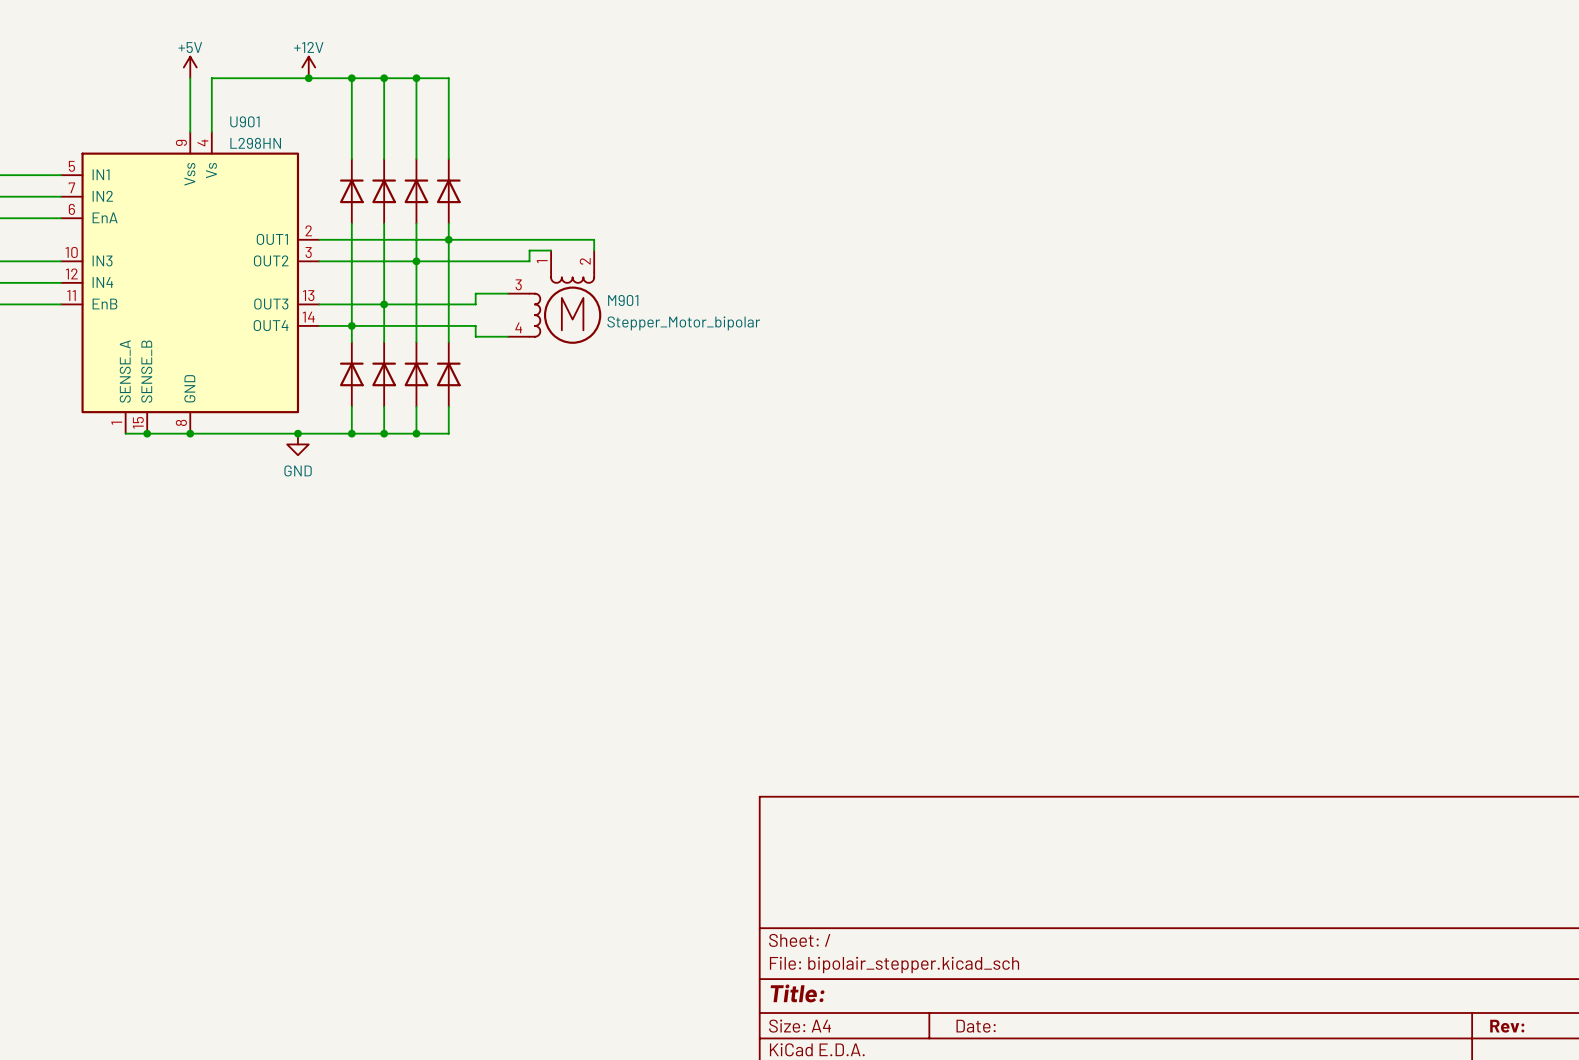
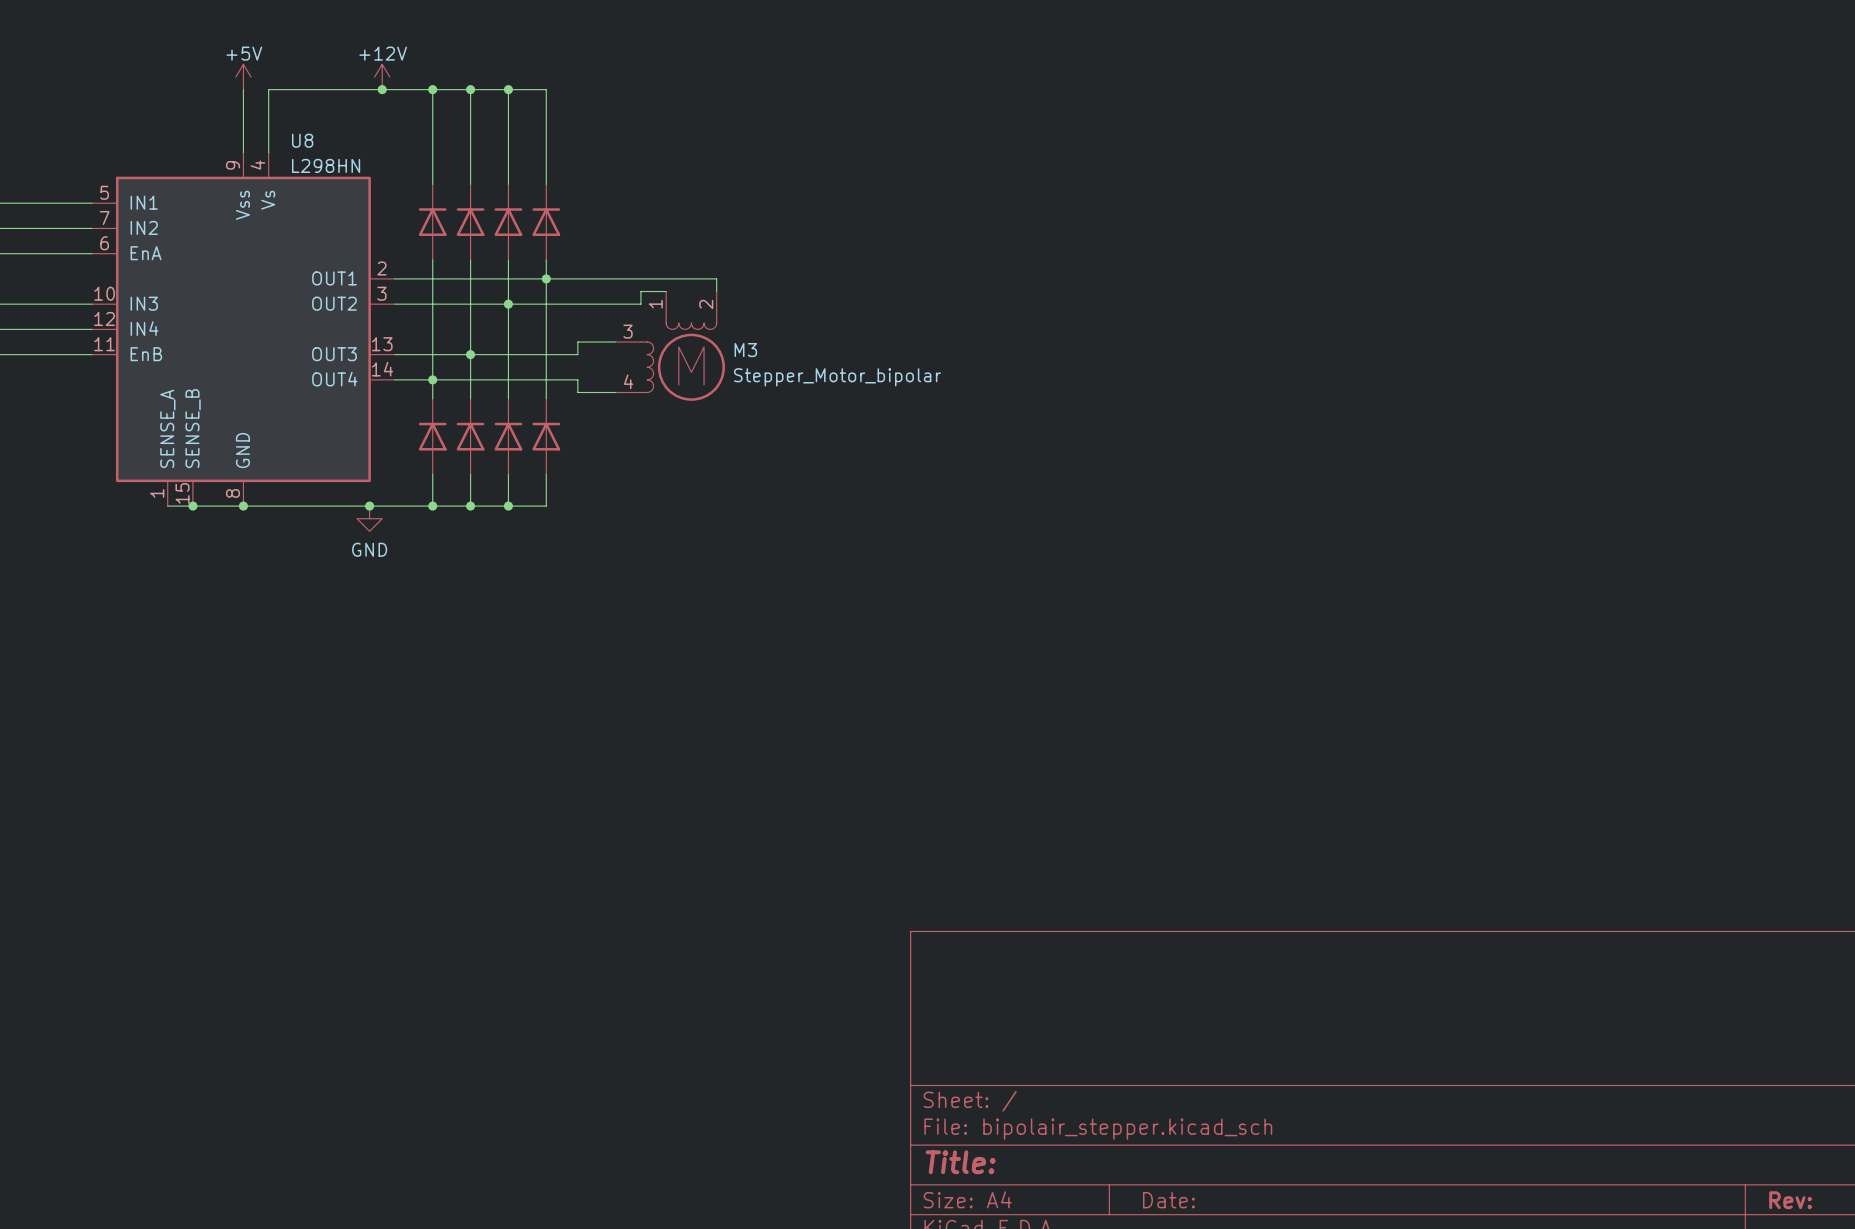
U901 name: U901 (244, 121) -> U8 (302, 140)
M901 name: M901 (623, 300) -> M3 (745, 350)

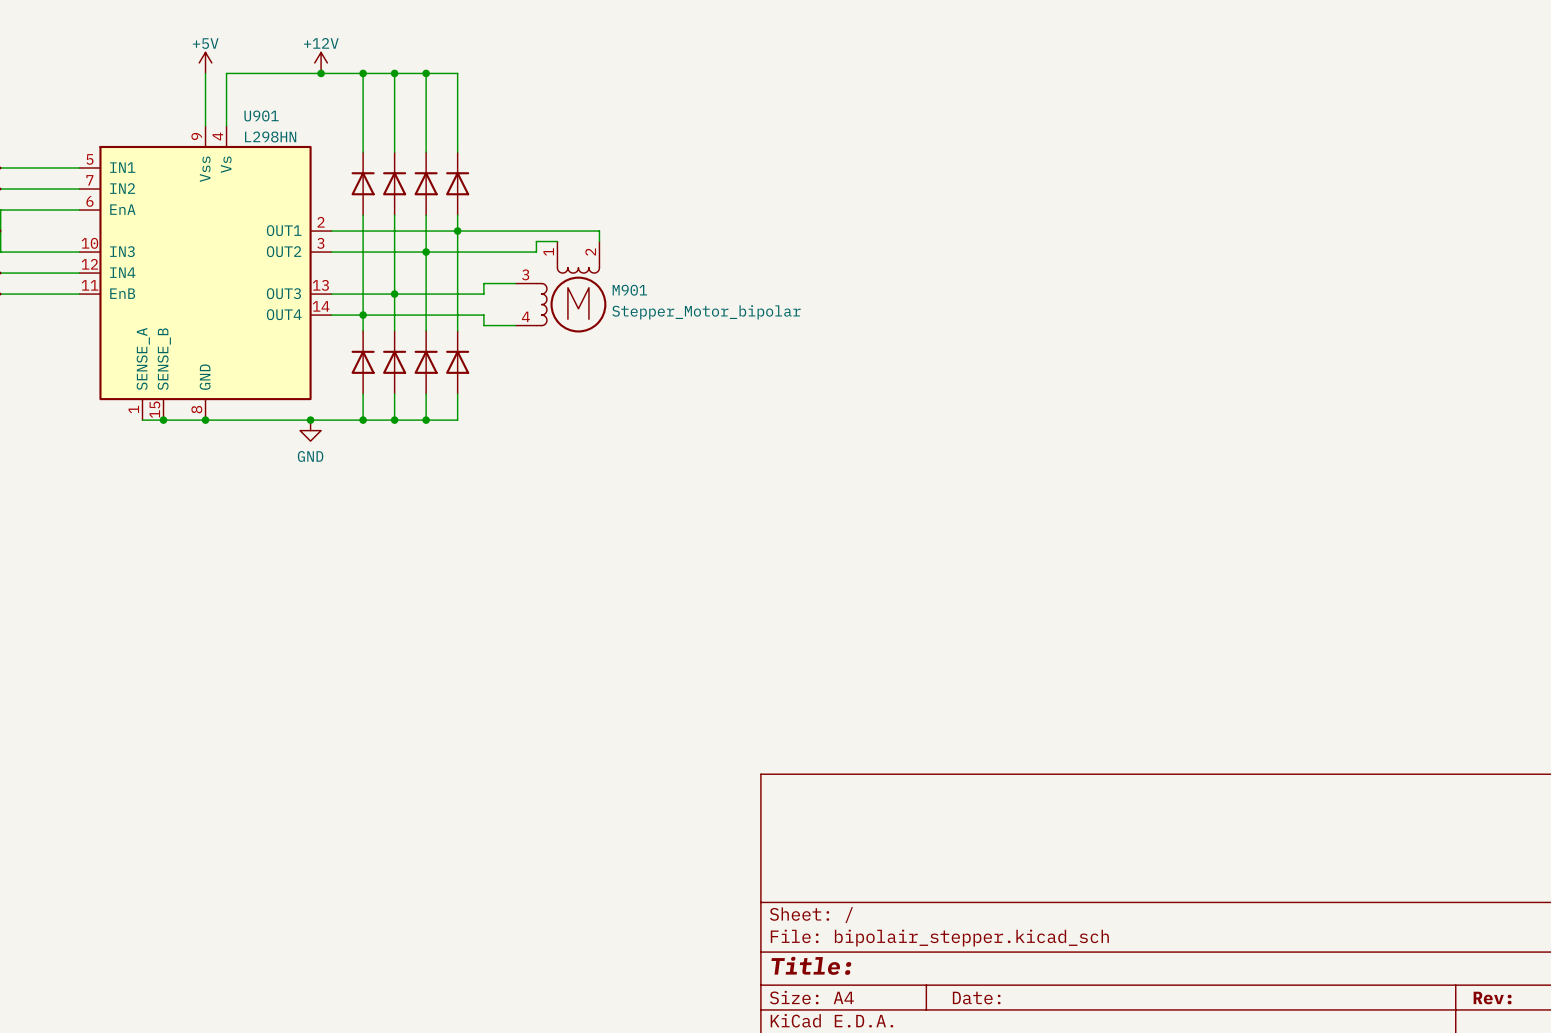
U8 name: U8 (302, 140) -> U901 (261, 115)
M3 name: M3 (745, 350) -> M901 (629, 290)

